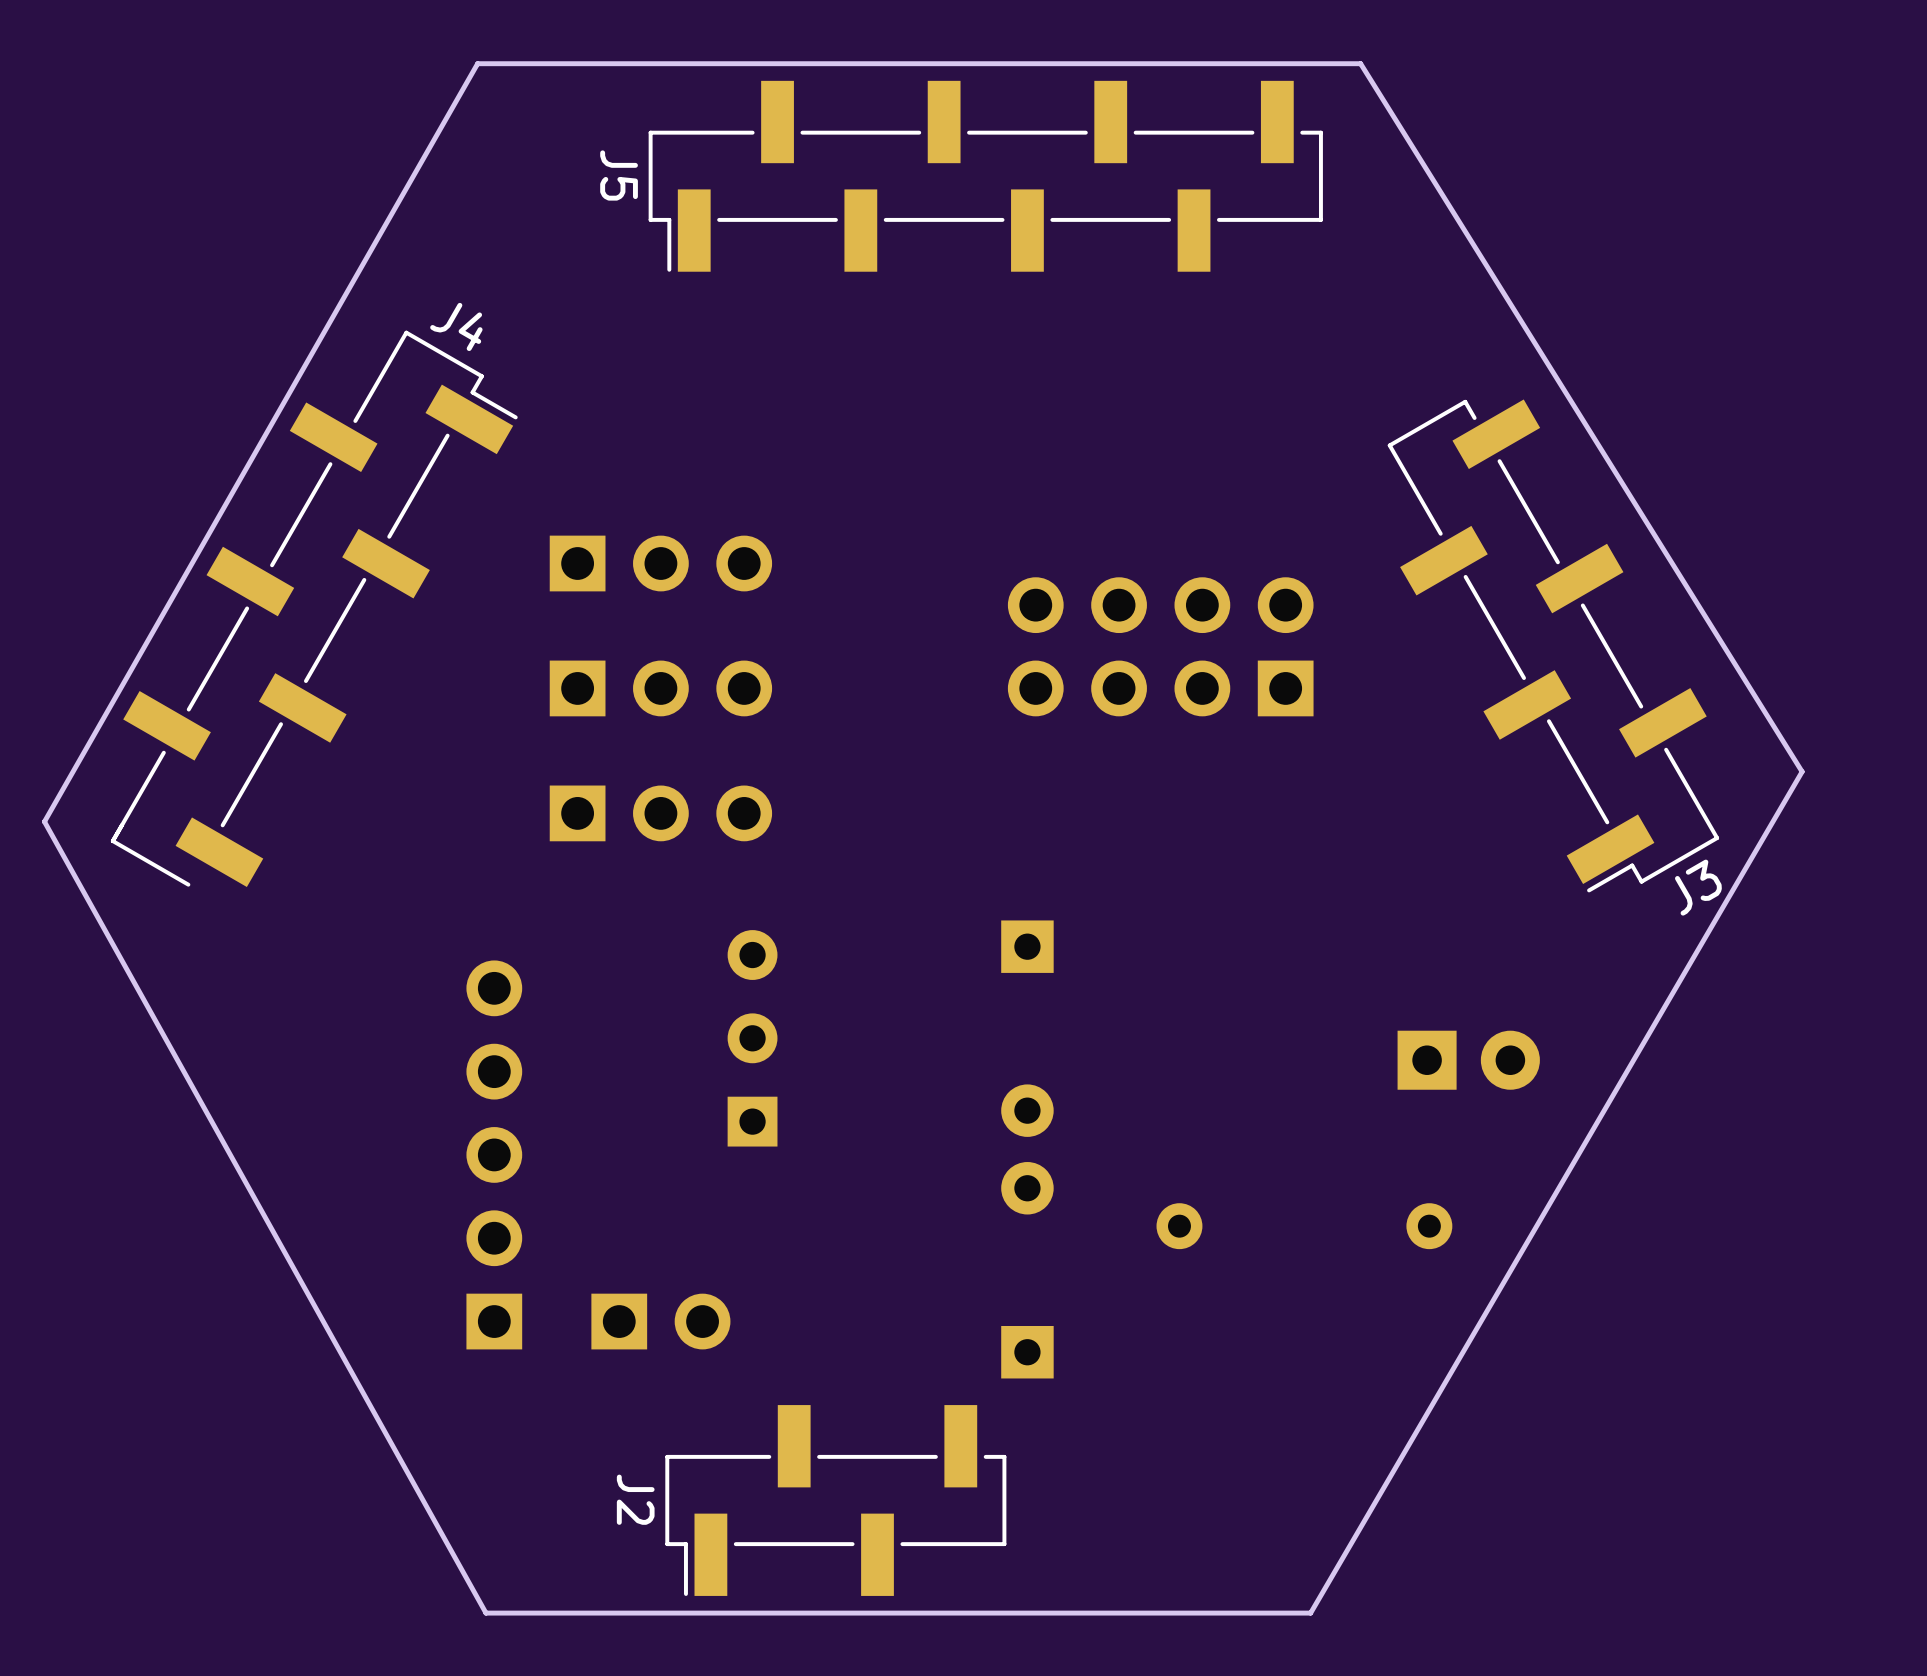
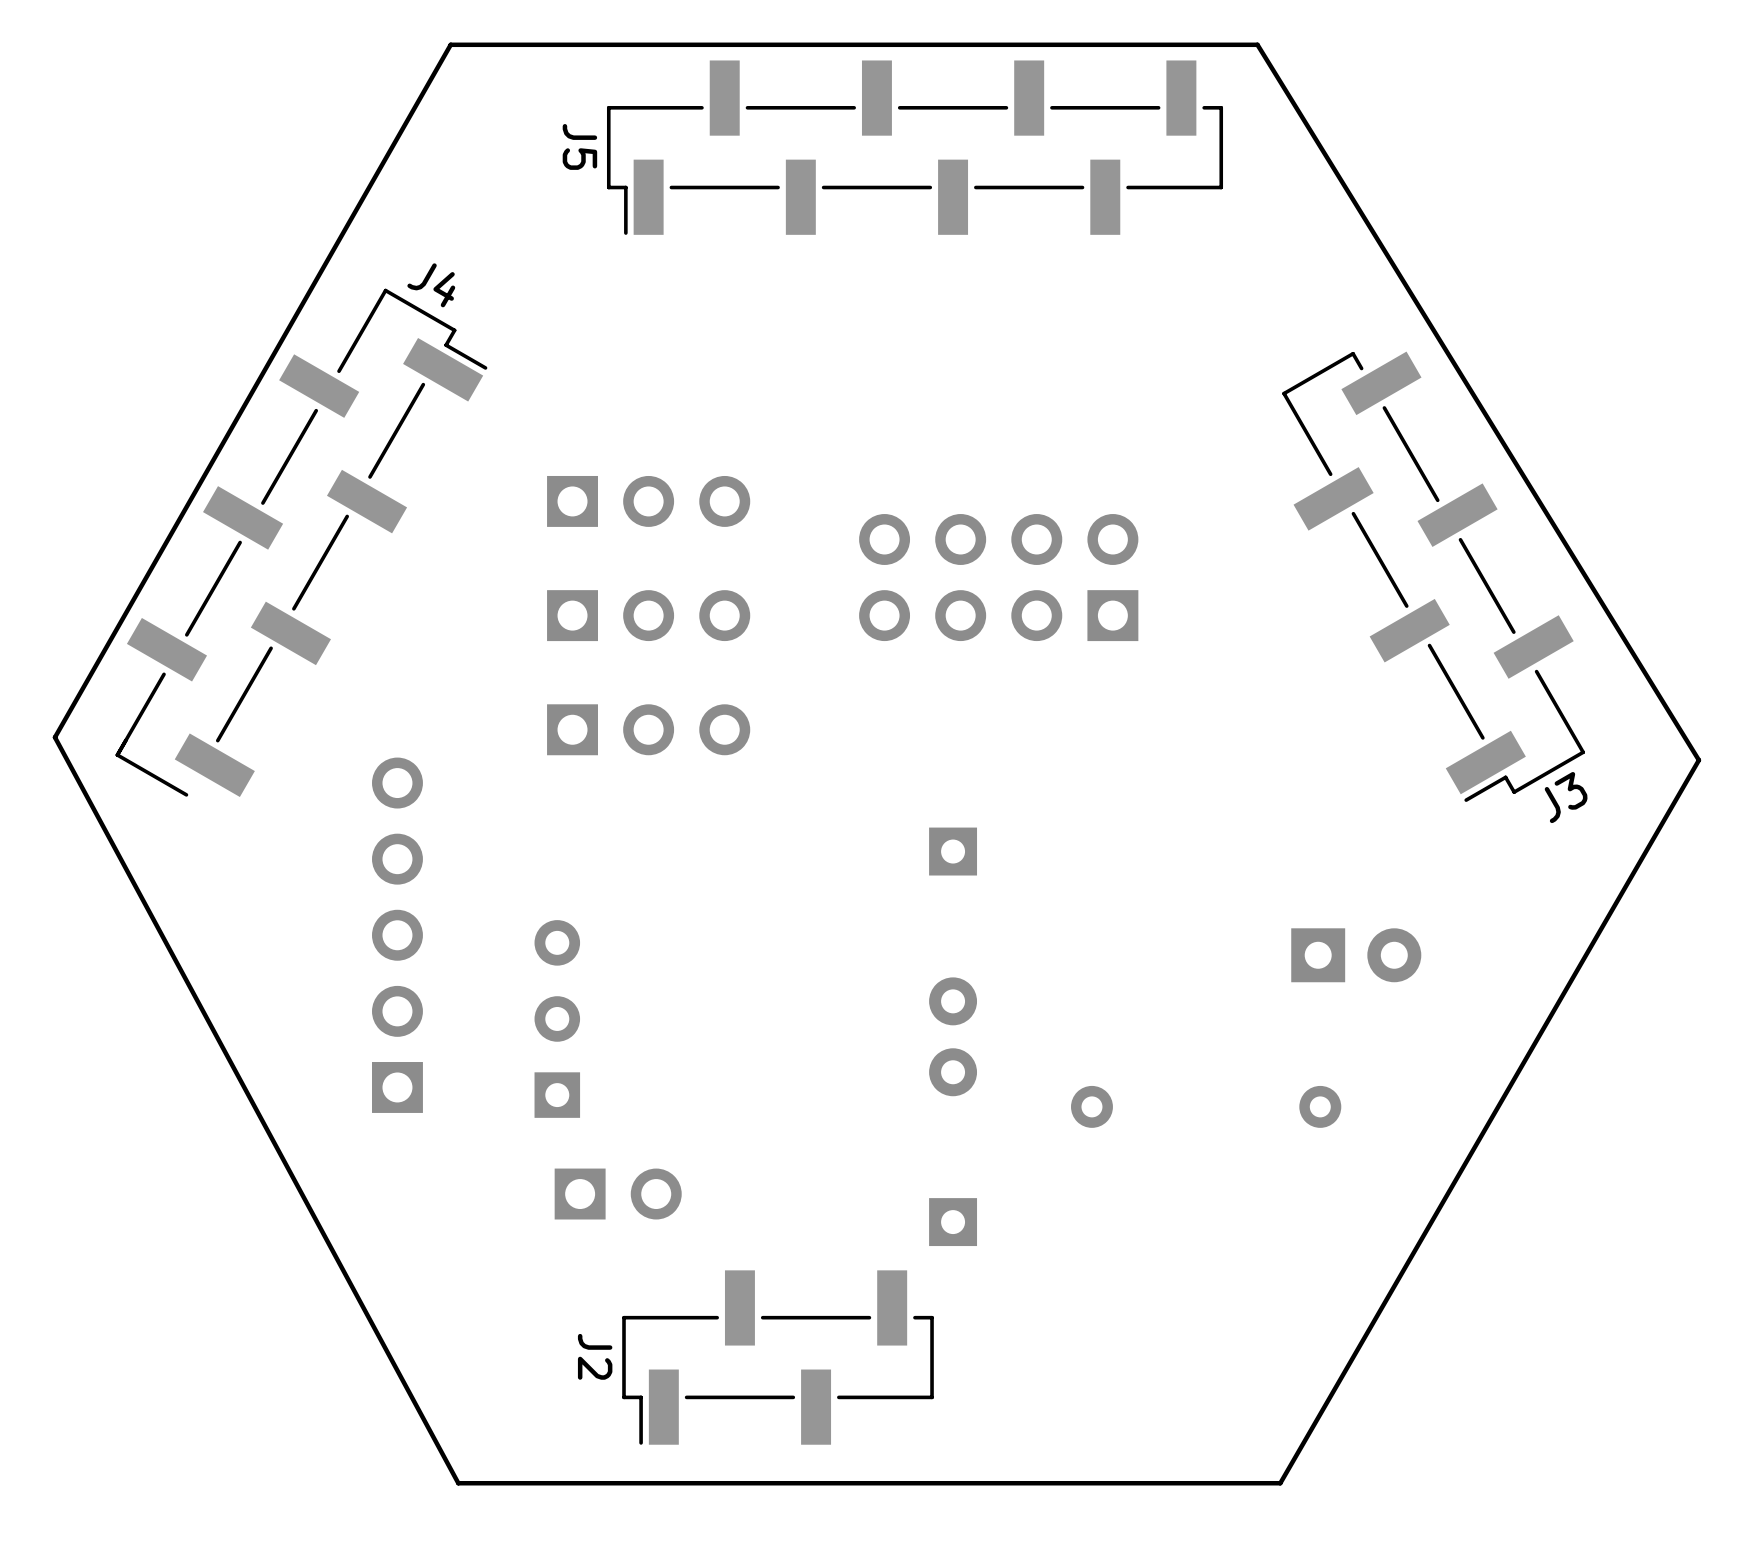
board edge: (1360, 63) (1802, 771) (1310, 1613) (485, 1613) (44, 821) -> (1257, 44) (1698, 760) (1280, 1483) (458, 1483) (54, 737)
part position: (660, 563) -> (648, 501)
part position: (1160, 646) -> (998, 577)
part position: (660, 688) -> (648, 615)
part position: (660, 813) -> (648, 729)
part position: (752, 1038) -> (557, 1018)
part position: (494, 1154) -> (397, 935)

